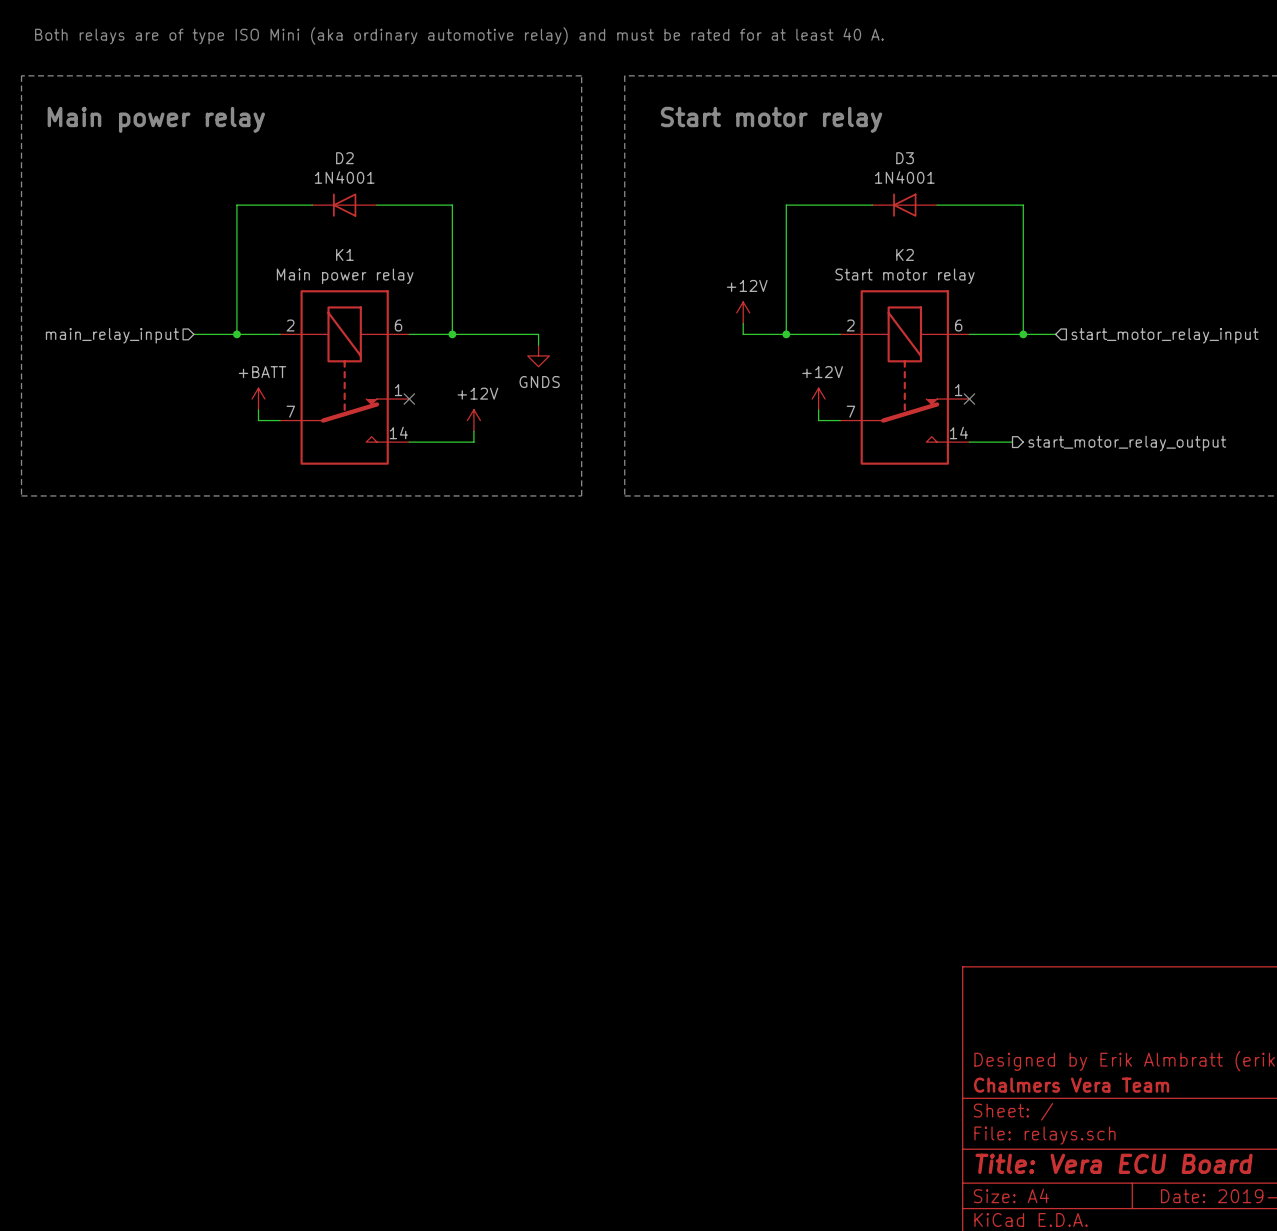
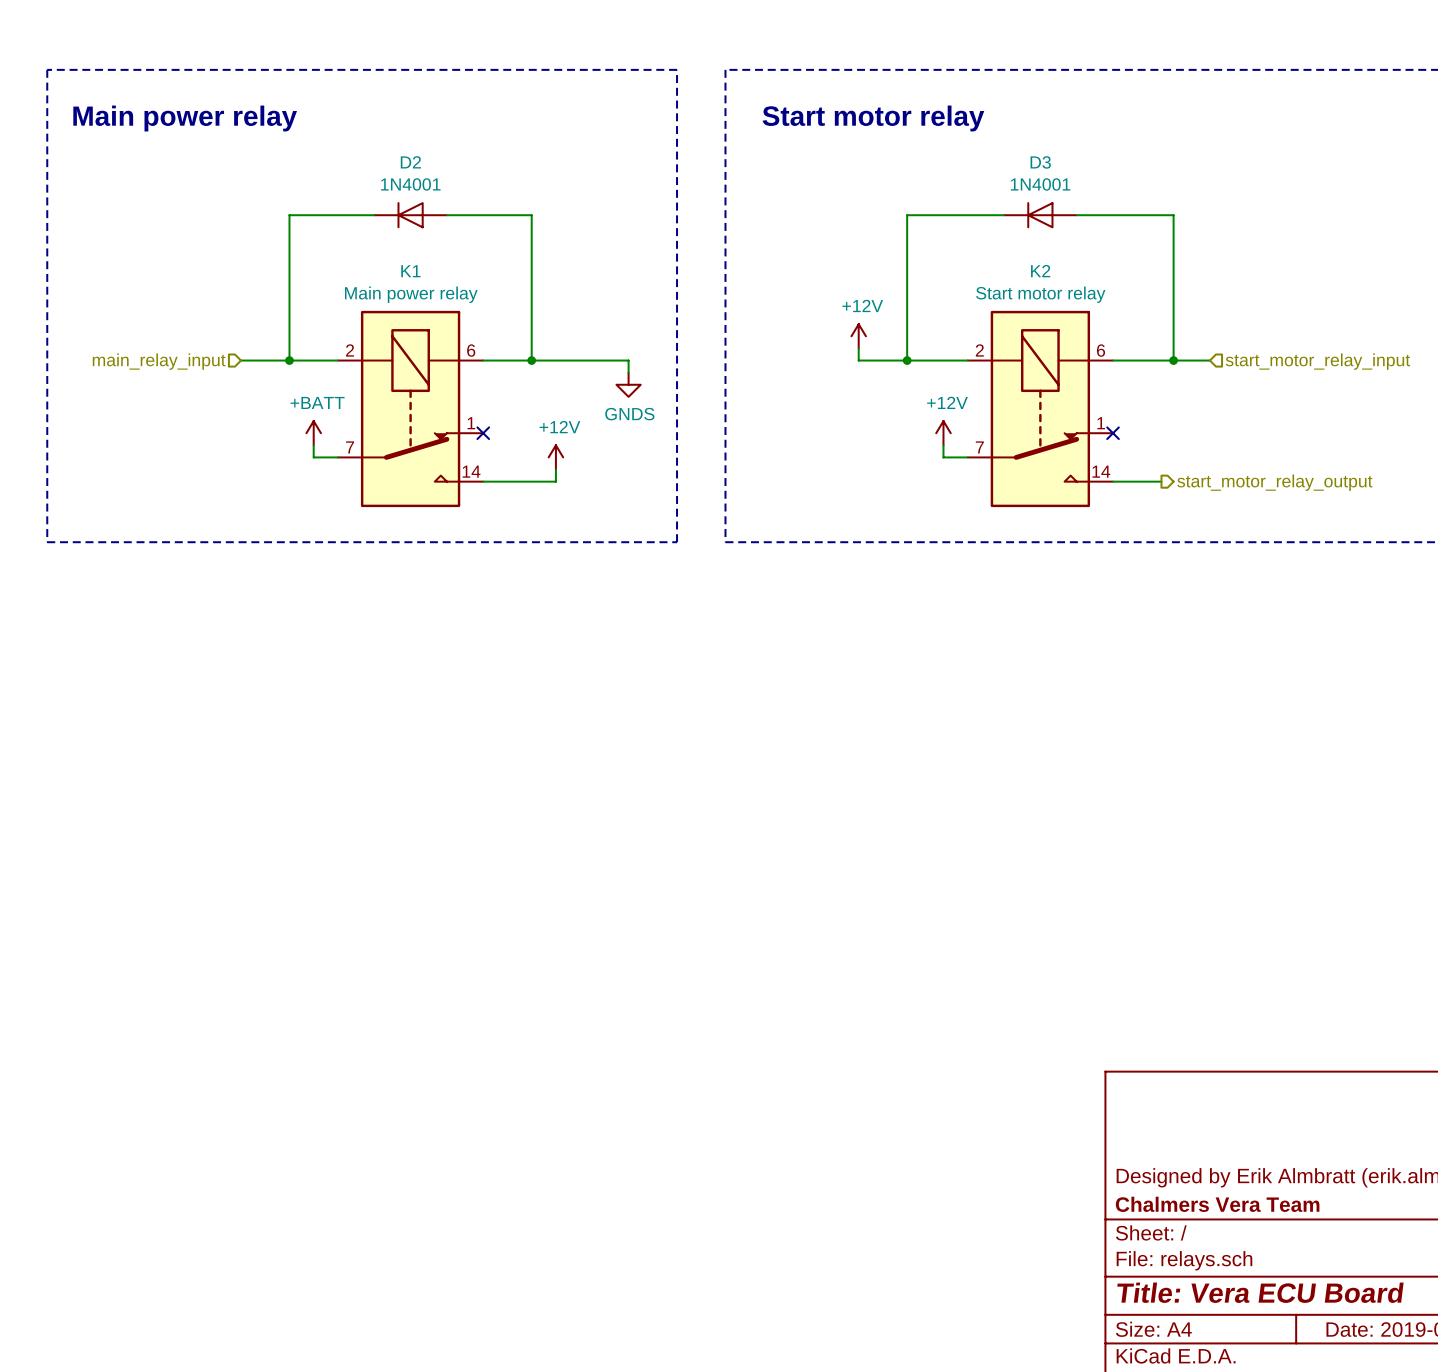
text: Both relays are of type ISO Mini (aka ordinary automotive relay) and must be rated for at least 40 A. (459, 36) -> none

